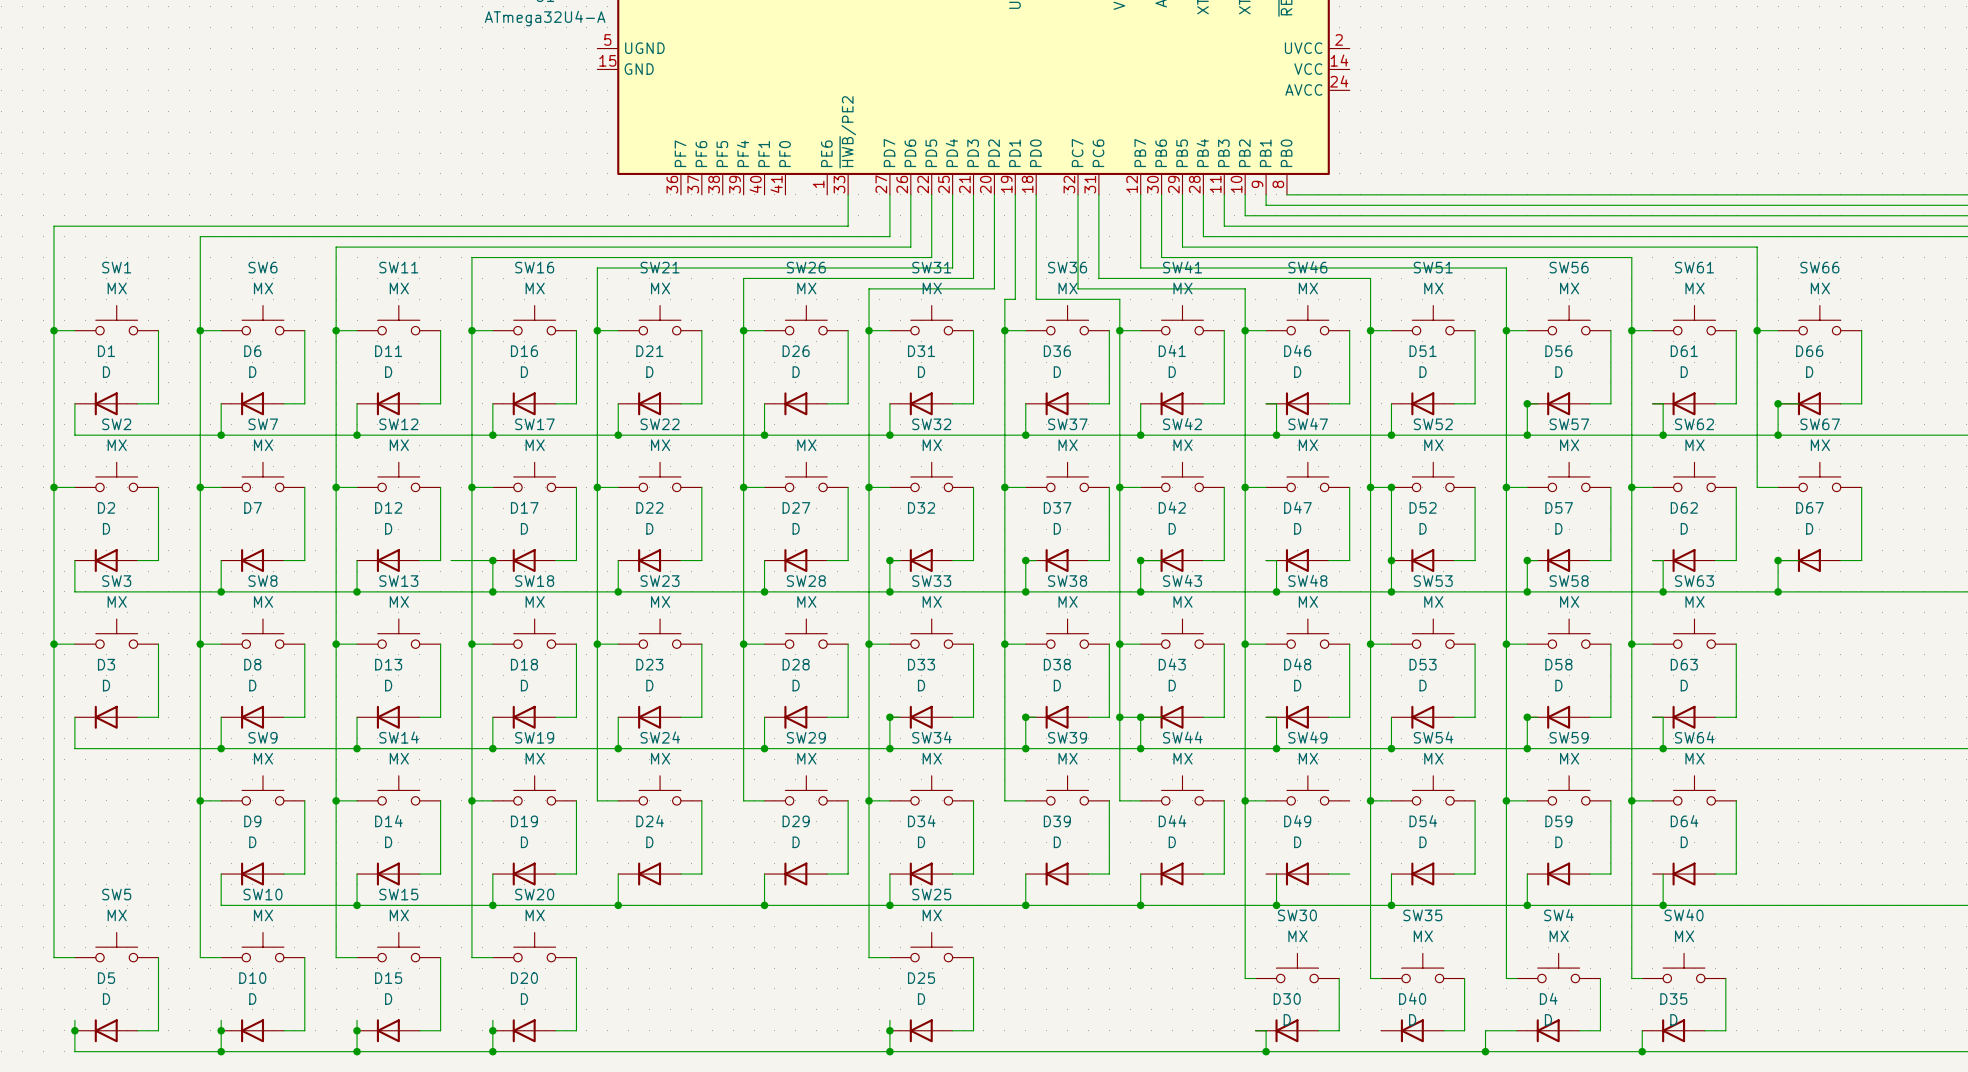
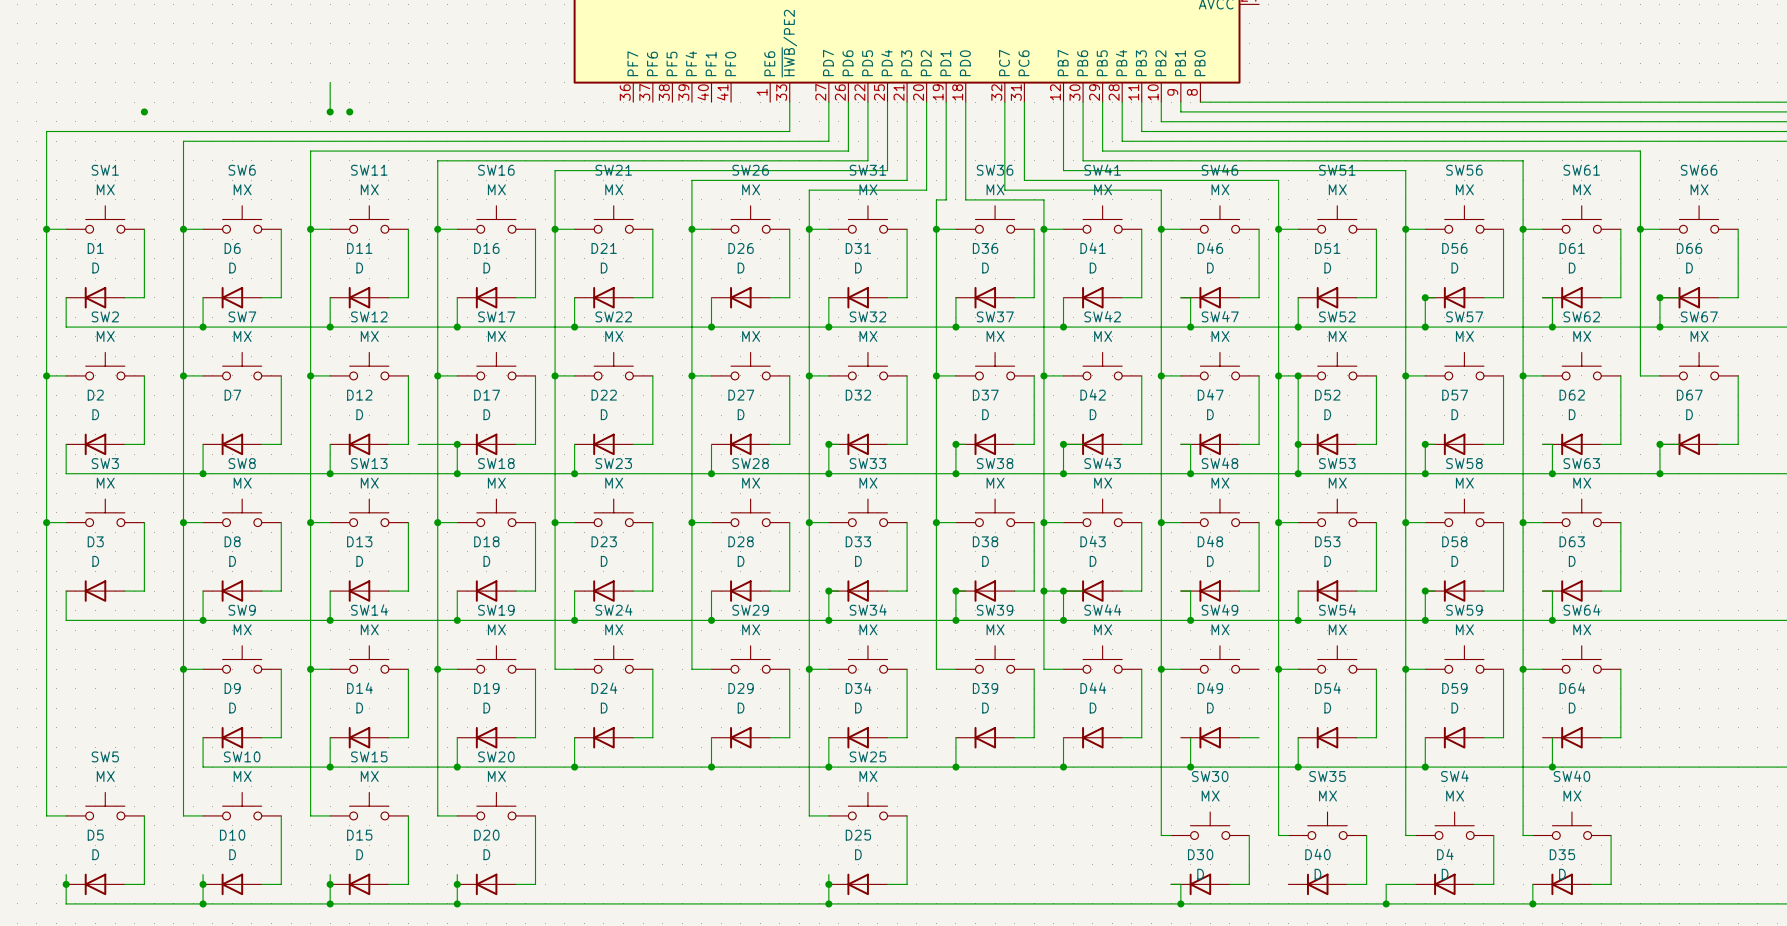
wire: none -> (330, 82) (330, 111)
junction: none -> (144, 111)
junction: none -> (330, 111)
junction: none -> (349, 111)

